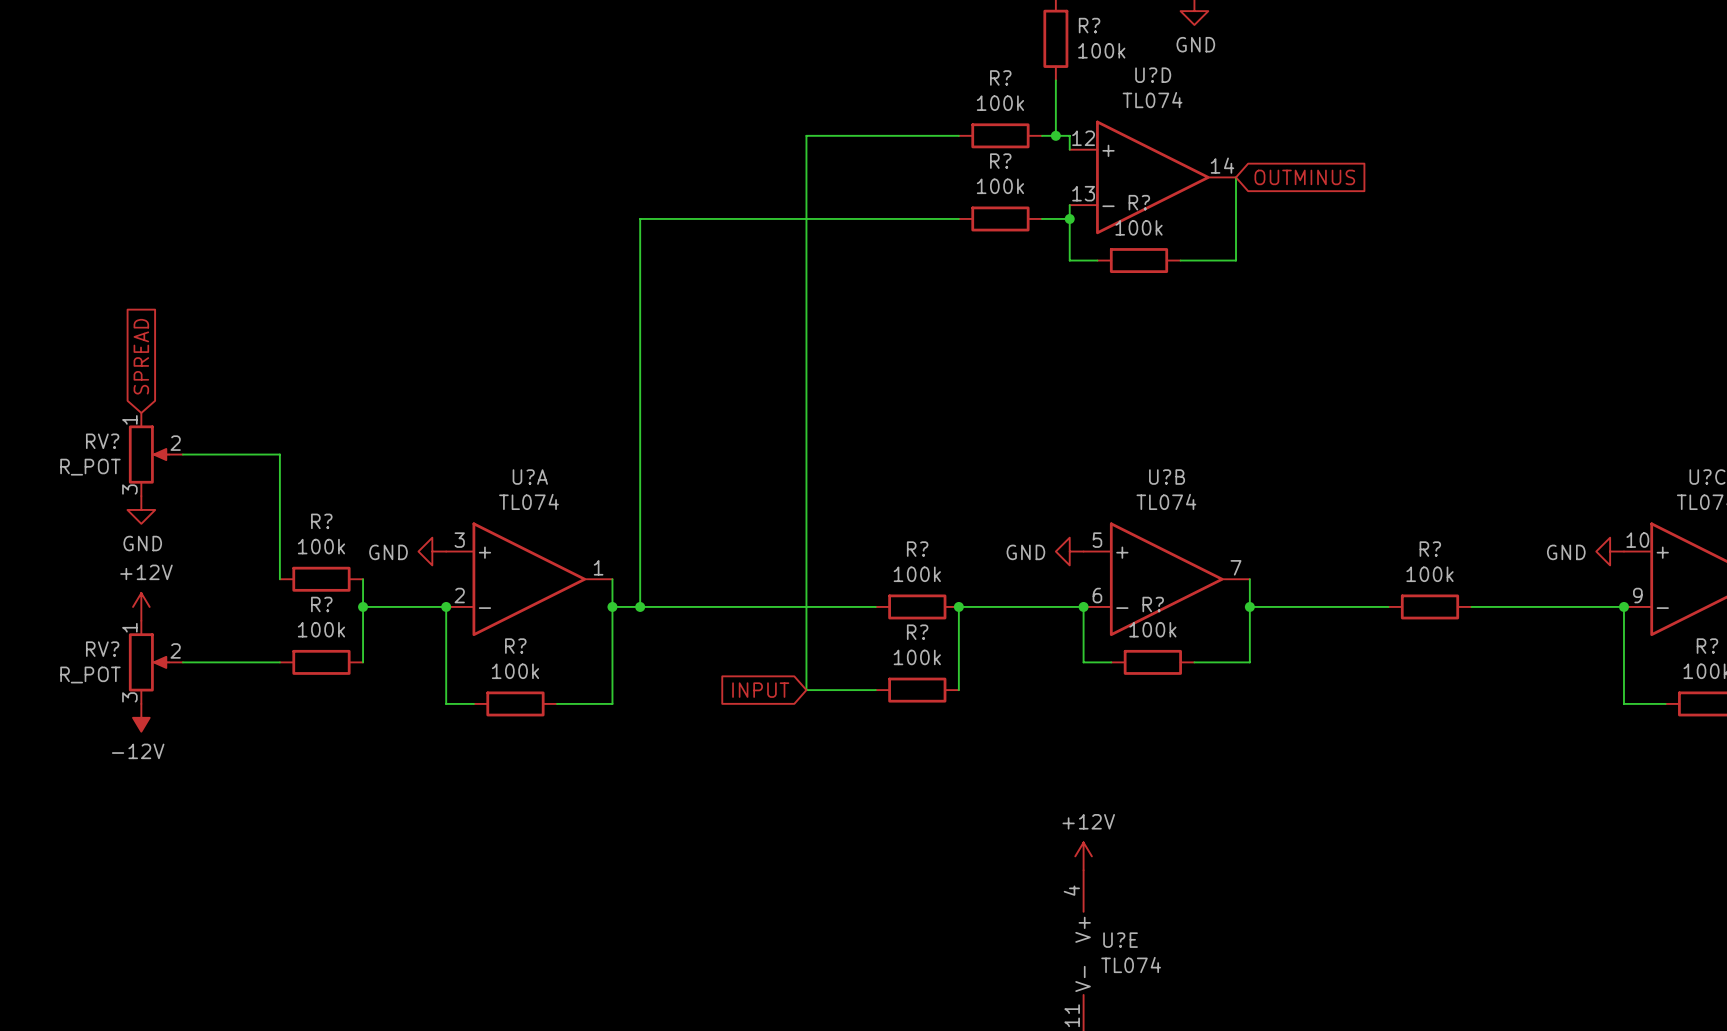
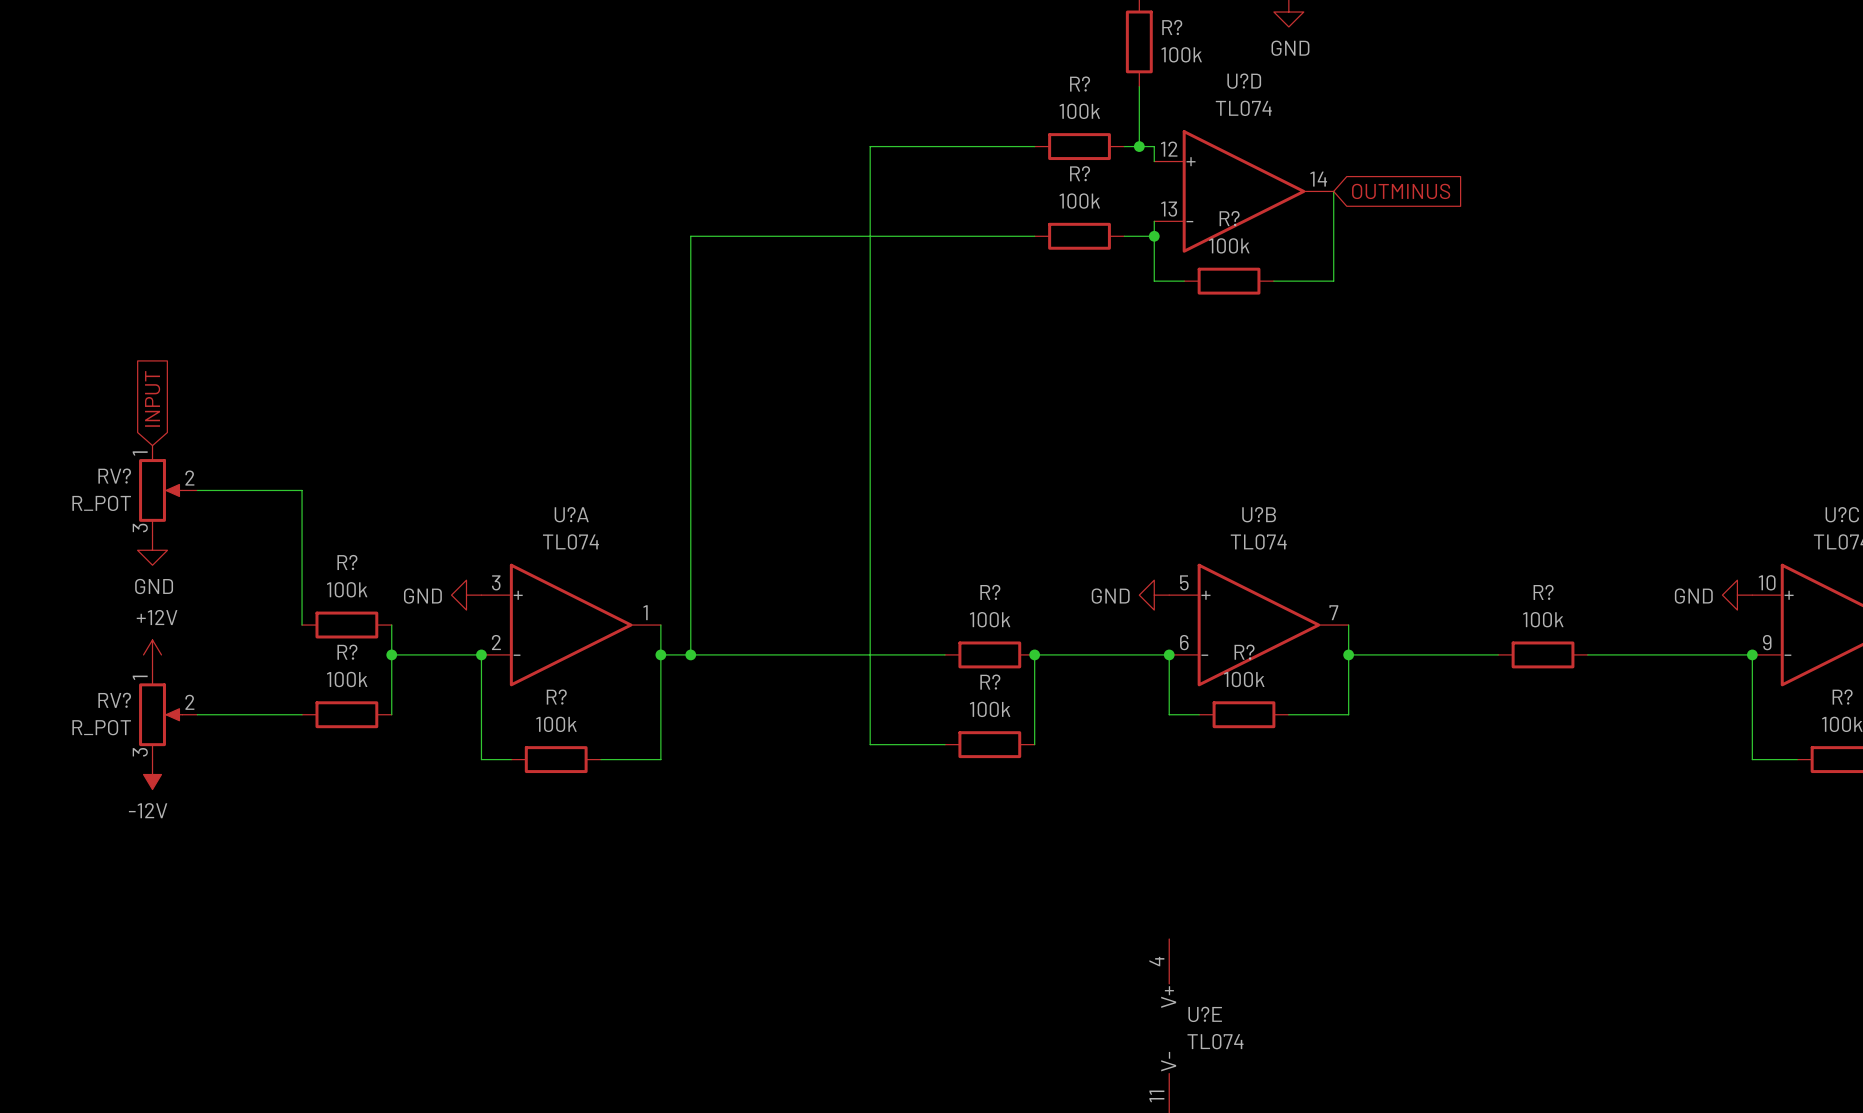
global label: SPREAD (141, 356) -> INPUT (152, 398)
global label: INPUT (760, 690) -> none
power symbol: +12V (1083, 856) -> none

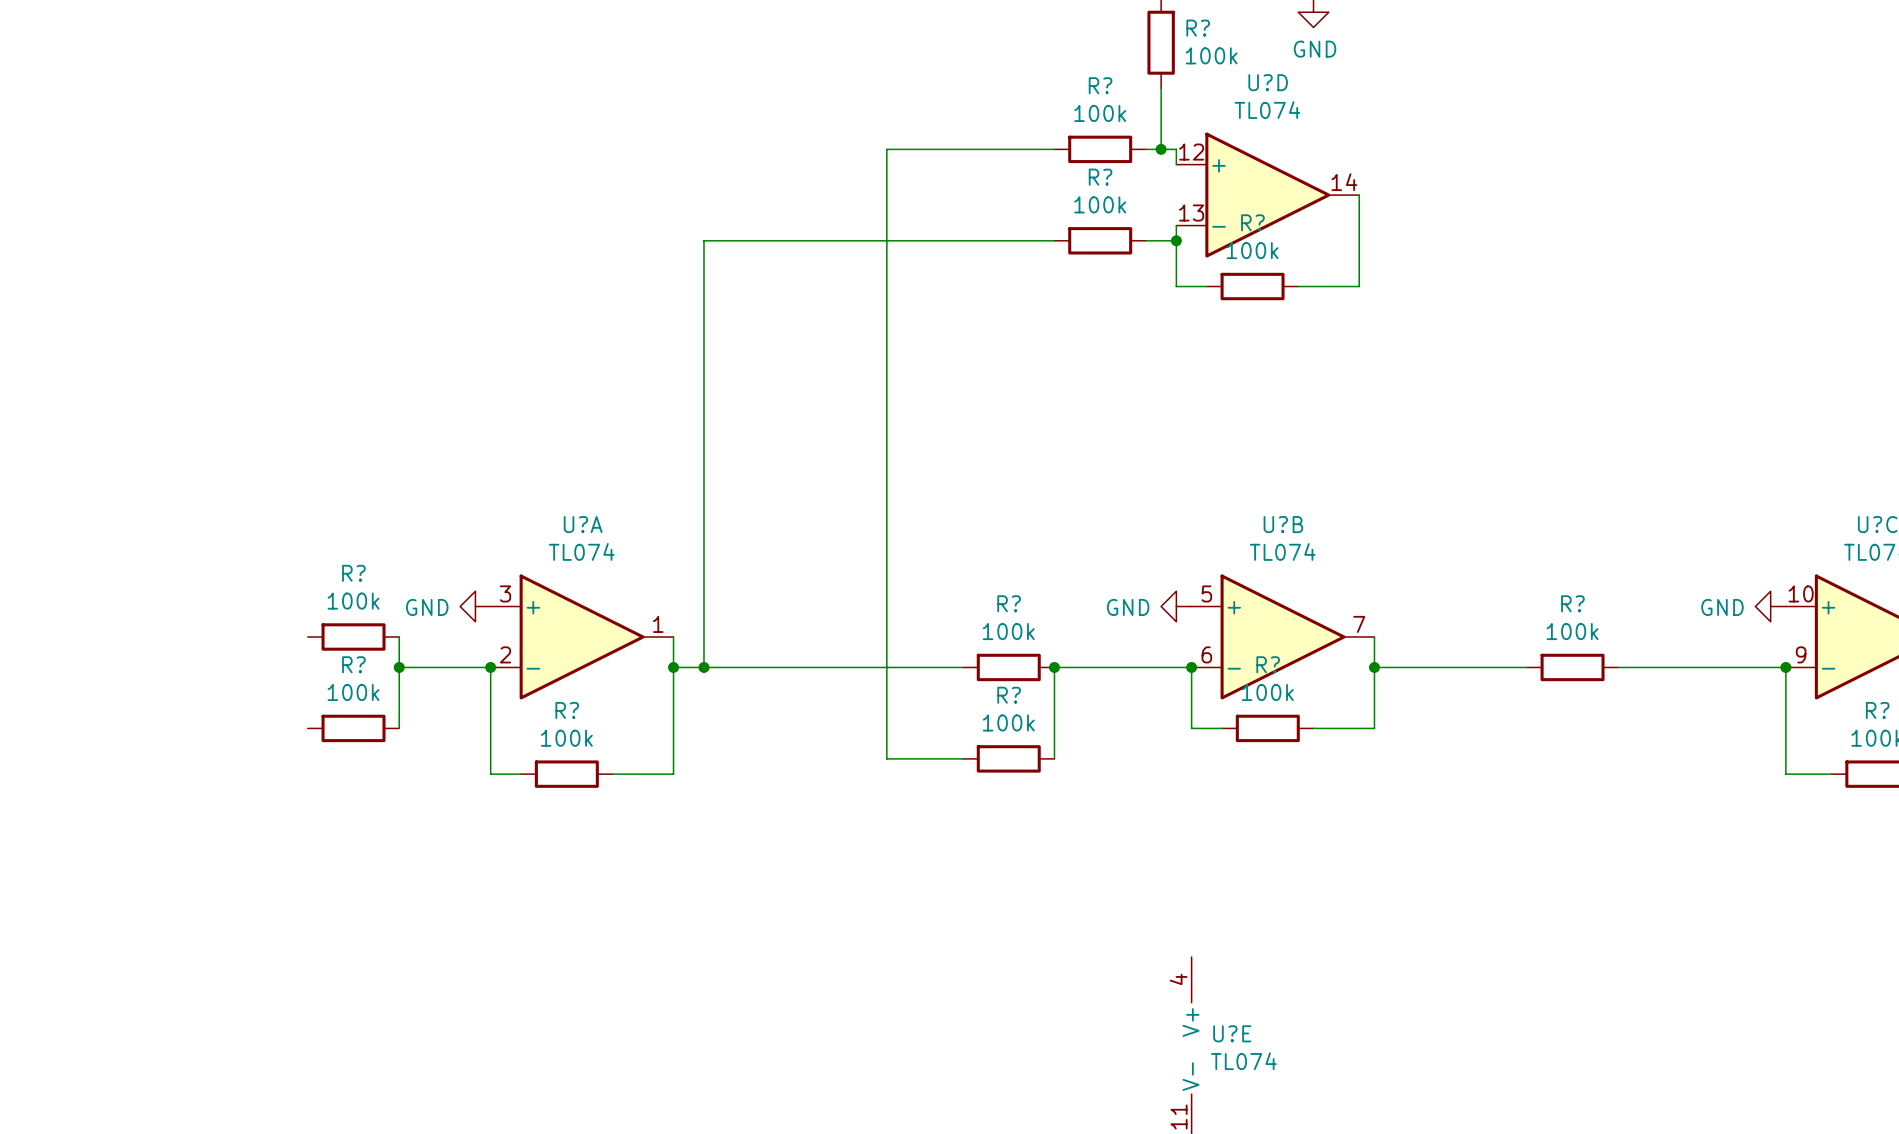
global label: OUTMINUS (1401, 191) -> none
global label: INPUT (152, 398) -> none
RV?: R_POT (168, 490) -> none
wire: (197, 490) (302, 490) (302, 625) -> none
power symbol: GND (152, 550) -> none
power symbol: +12V (152, 654) -> none
RV?: R_POT (168, 714) -> none
wire: (197, 714) (302, 714) -> none
power symbol: -12V (152, 774) -> none

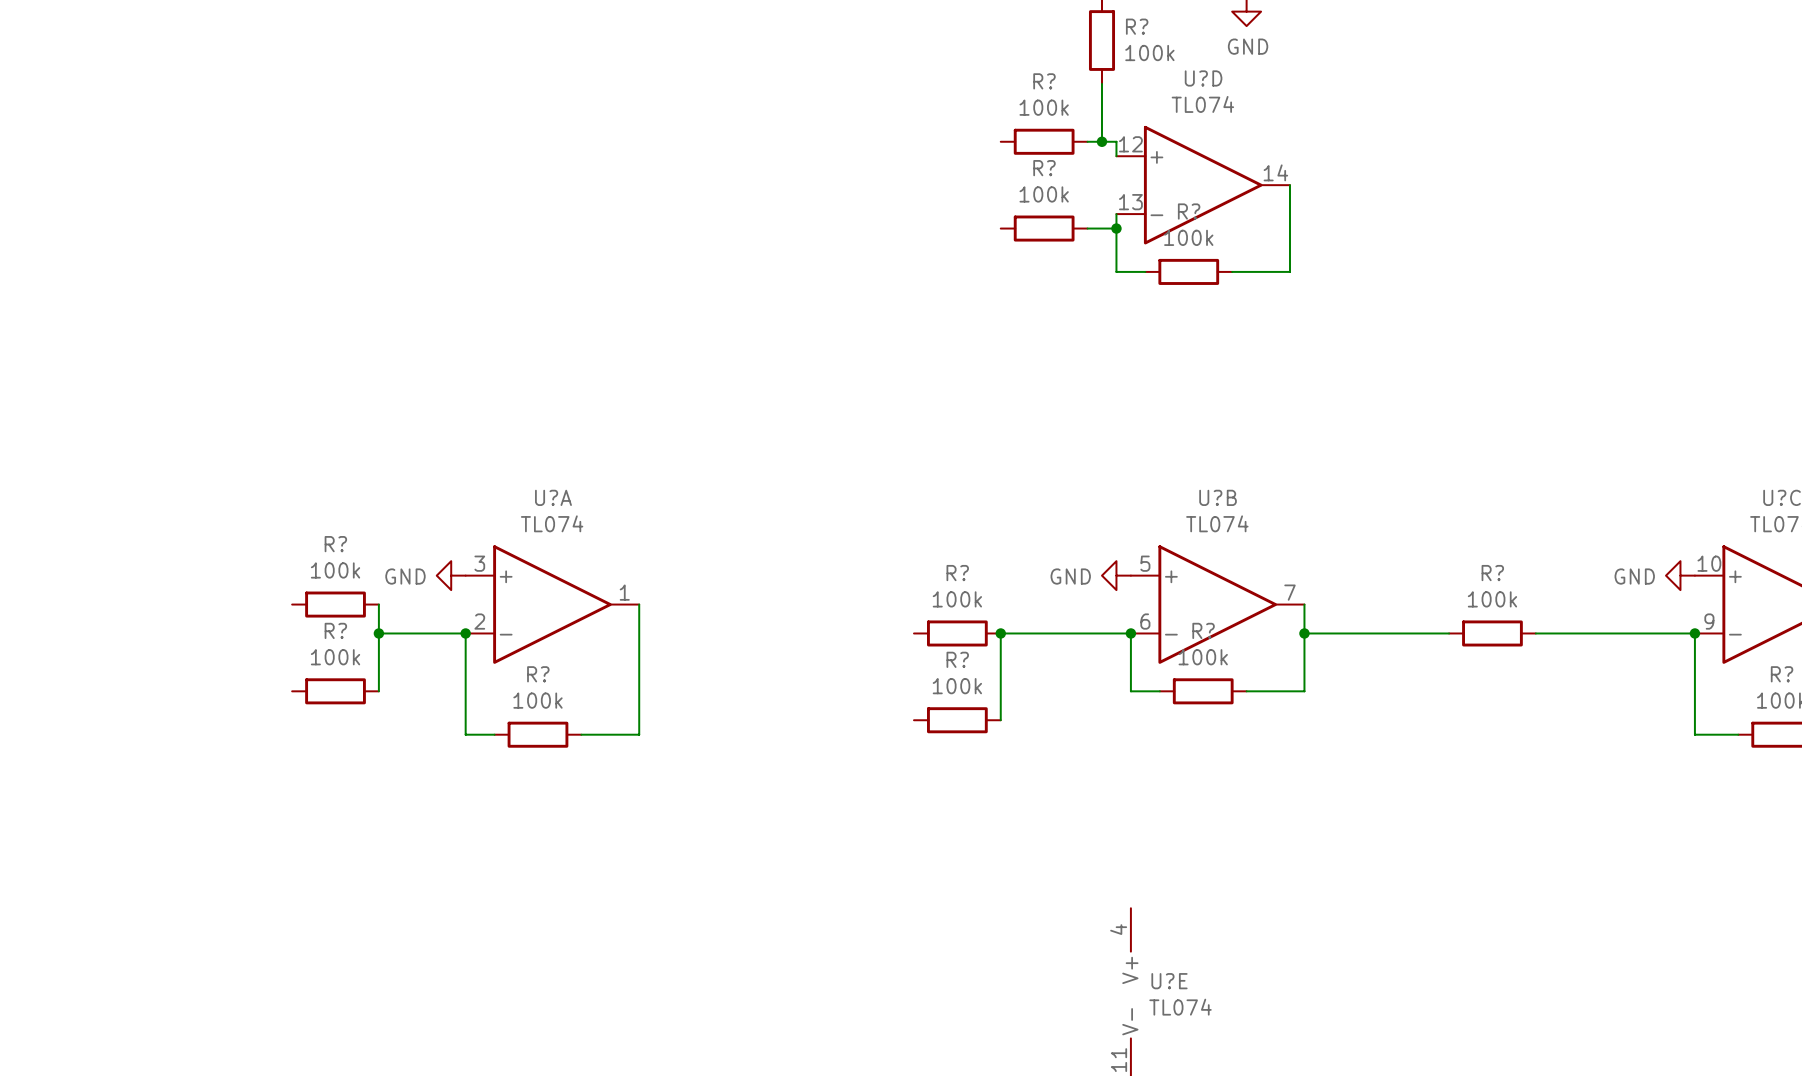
wire: (1054, 149) (886, 149) (886, 758) (963, 758) -> none
wire: (1054, 240) (704, 240) (704, 667) -> none
wire: (673, 667) (963, 667) -> none
junction: (673, 667) -> none
junction: (704, 667) -> none

